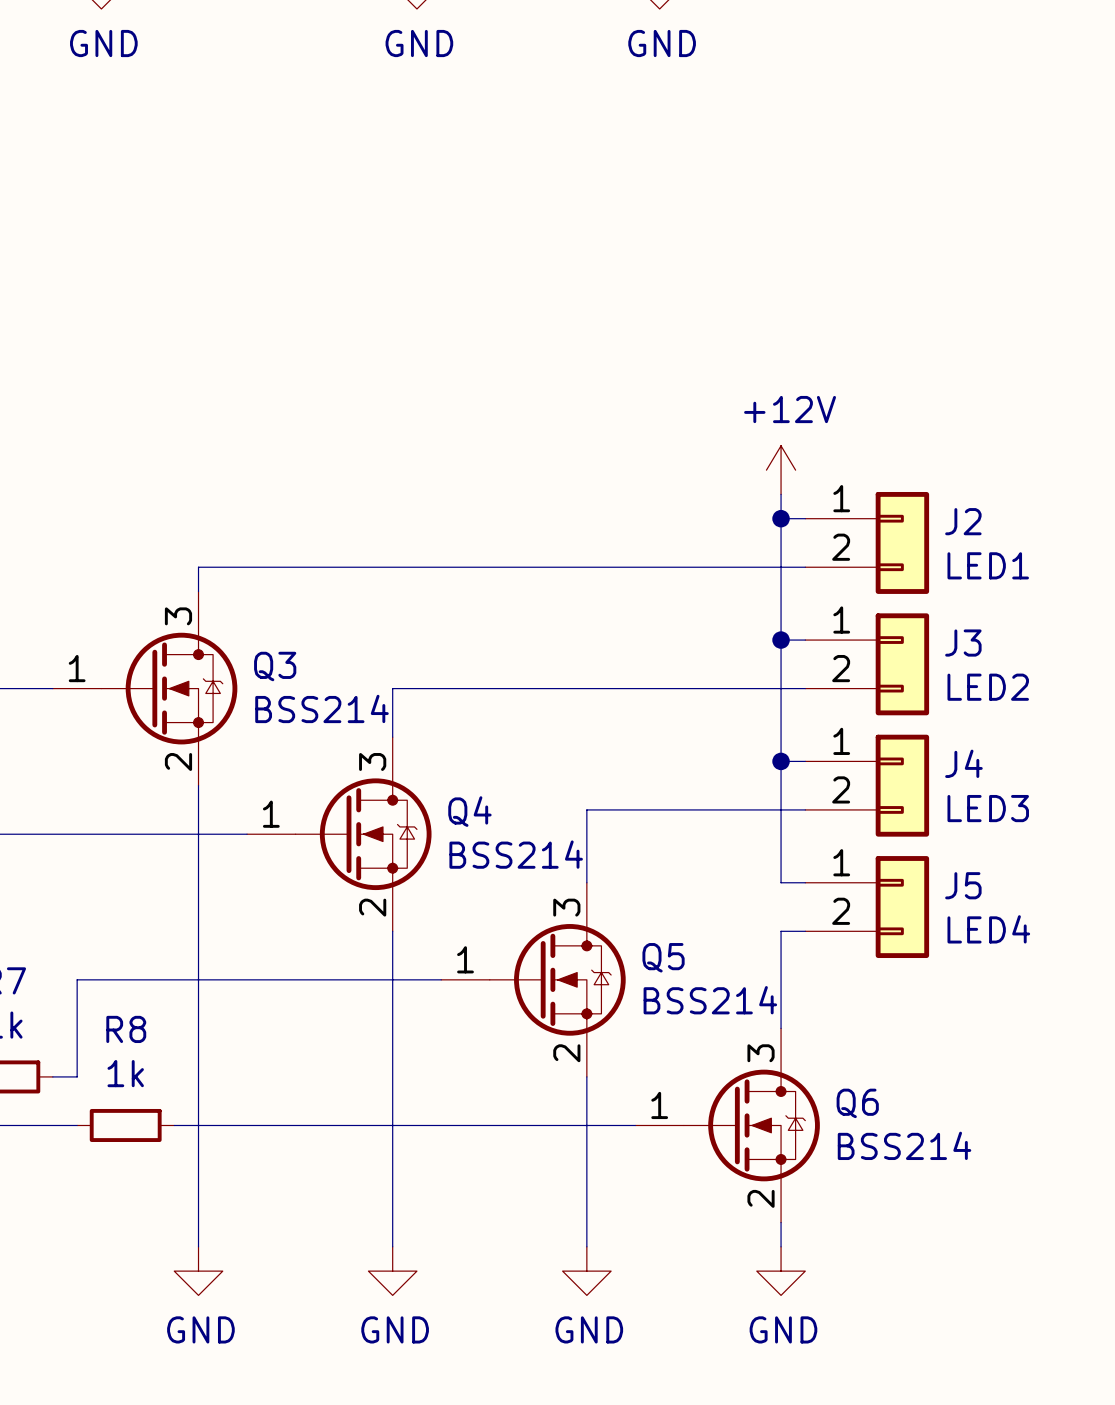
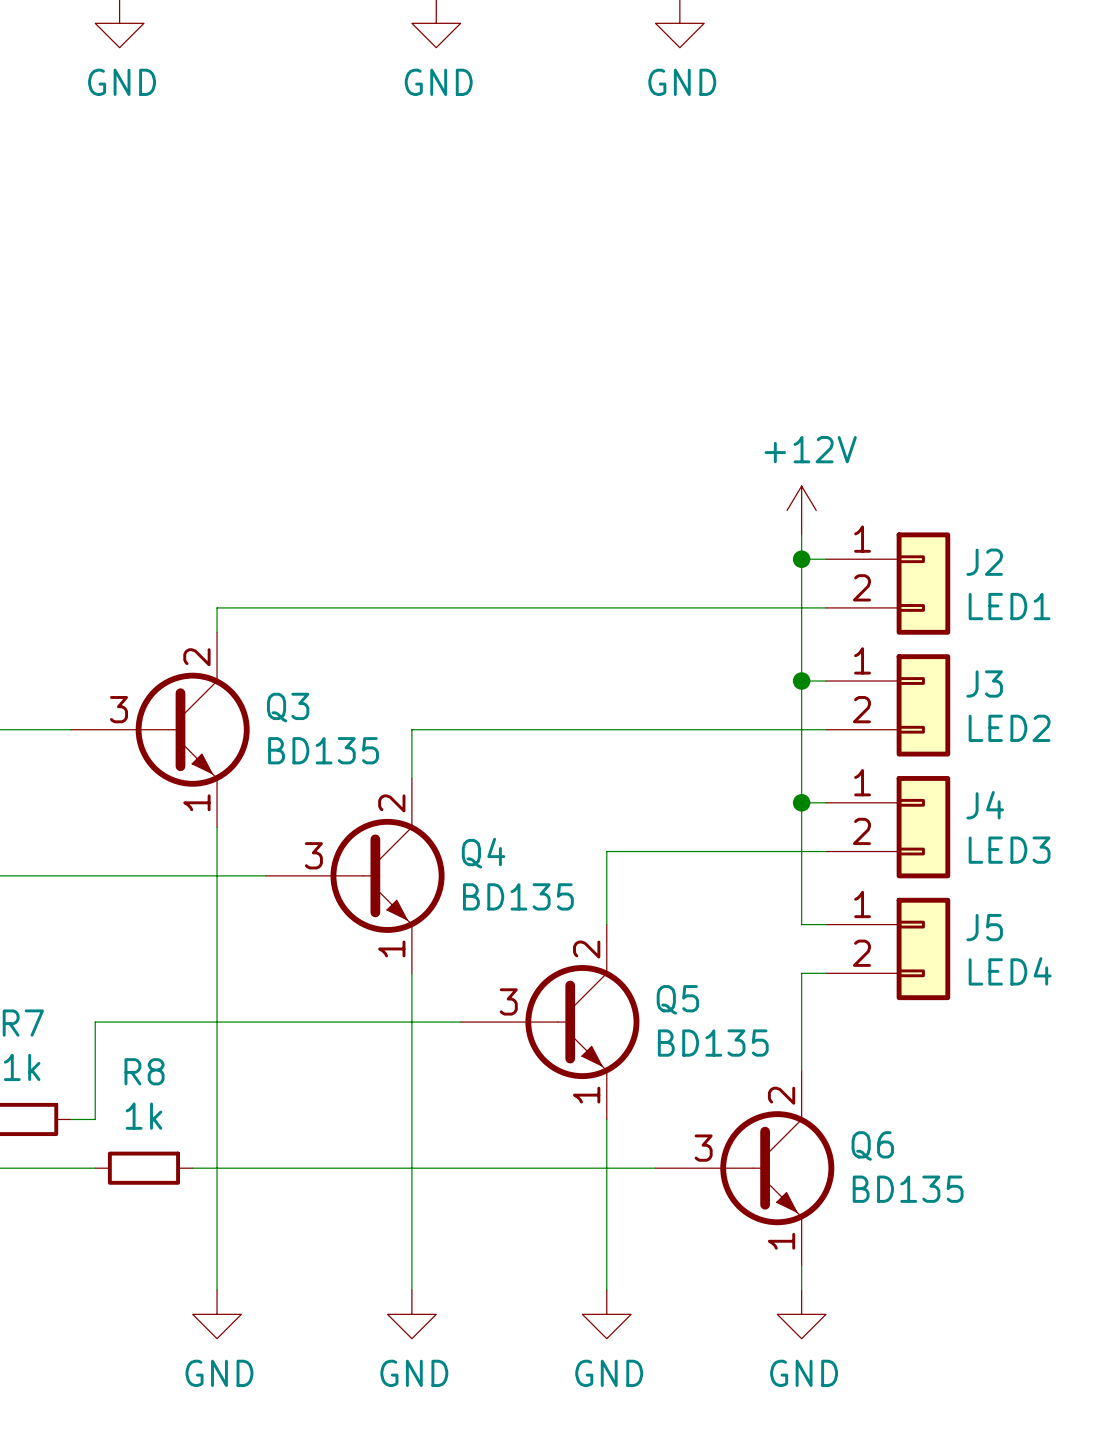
Q3 symbol: [52, 591, 238, 786] -> [70, 632, 250, 828]
Q3 value: BSS214 (321, 708) -> BD135 (323, 750)
Q4 symbol: [247, 737, 432, 932] -> [265, 778, 445, 974]
Q4 value: BSS214 (516, 854) -> BD135 (518, 896)
Q5 symbol: [441, 882, 626, 1077] -> [460, 924, 640, 1120]
Q5 value: BSS214 (710, 1000) -> BD135 (713, 1043)
Q6 symbol: [635, 1028, 820, 1223] -> [655, 1070, 835, 1266]
Q6 value: BSS214 (904, 1145) -> BD135 (908, 1189)

